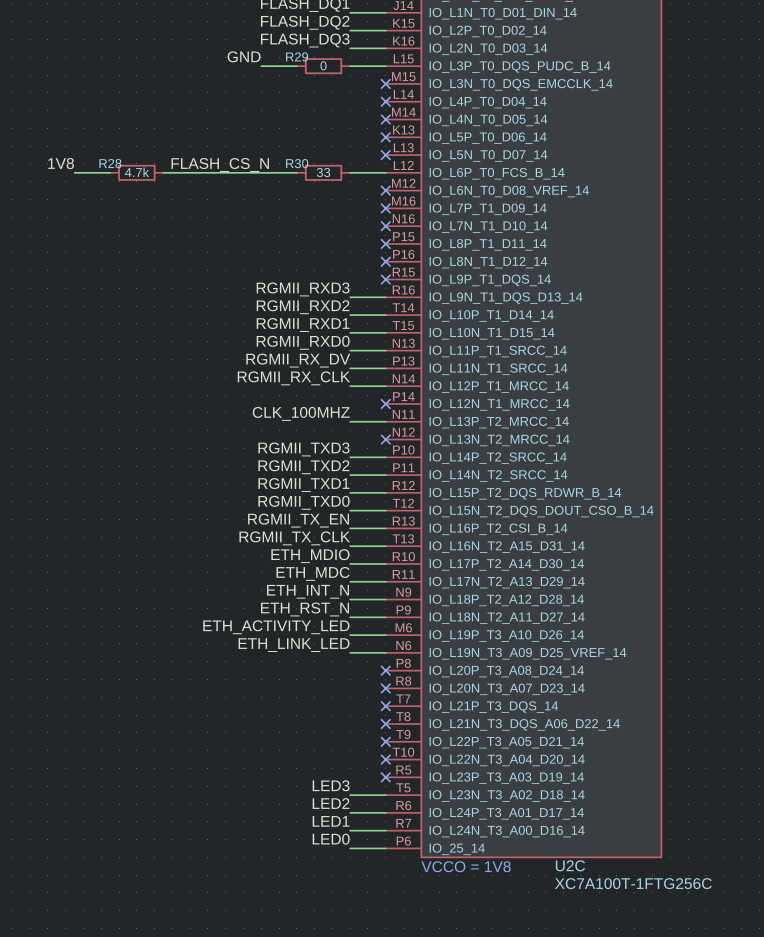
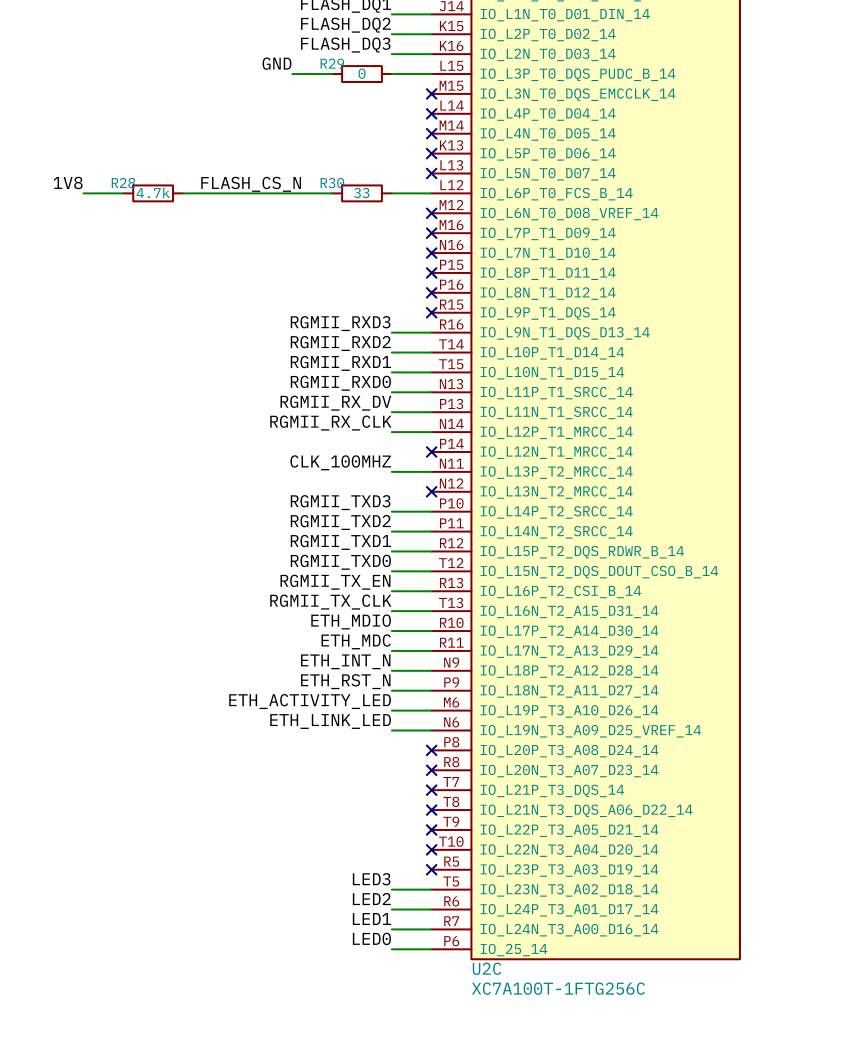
U2C name position: U2C (570, 865) -> U2C (486, 968)
text: VCCO = 1V8 (466, 866) -> none
U2C value position: XC7A100T-1FTG256C (633, 883) -> XC7A100T-1FTG256C (558, 988)

